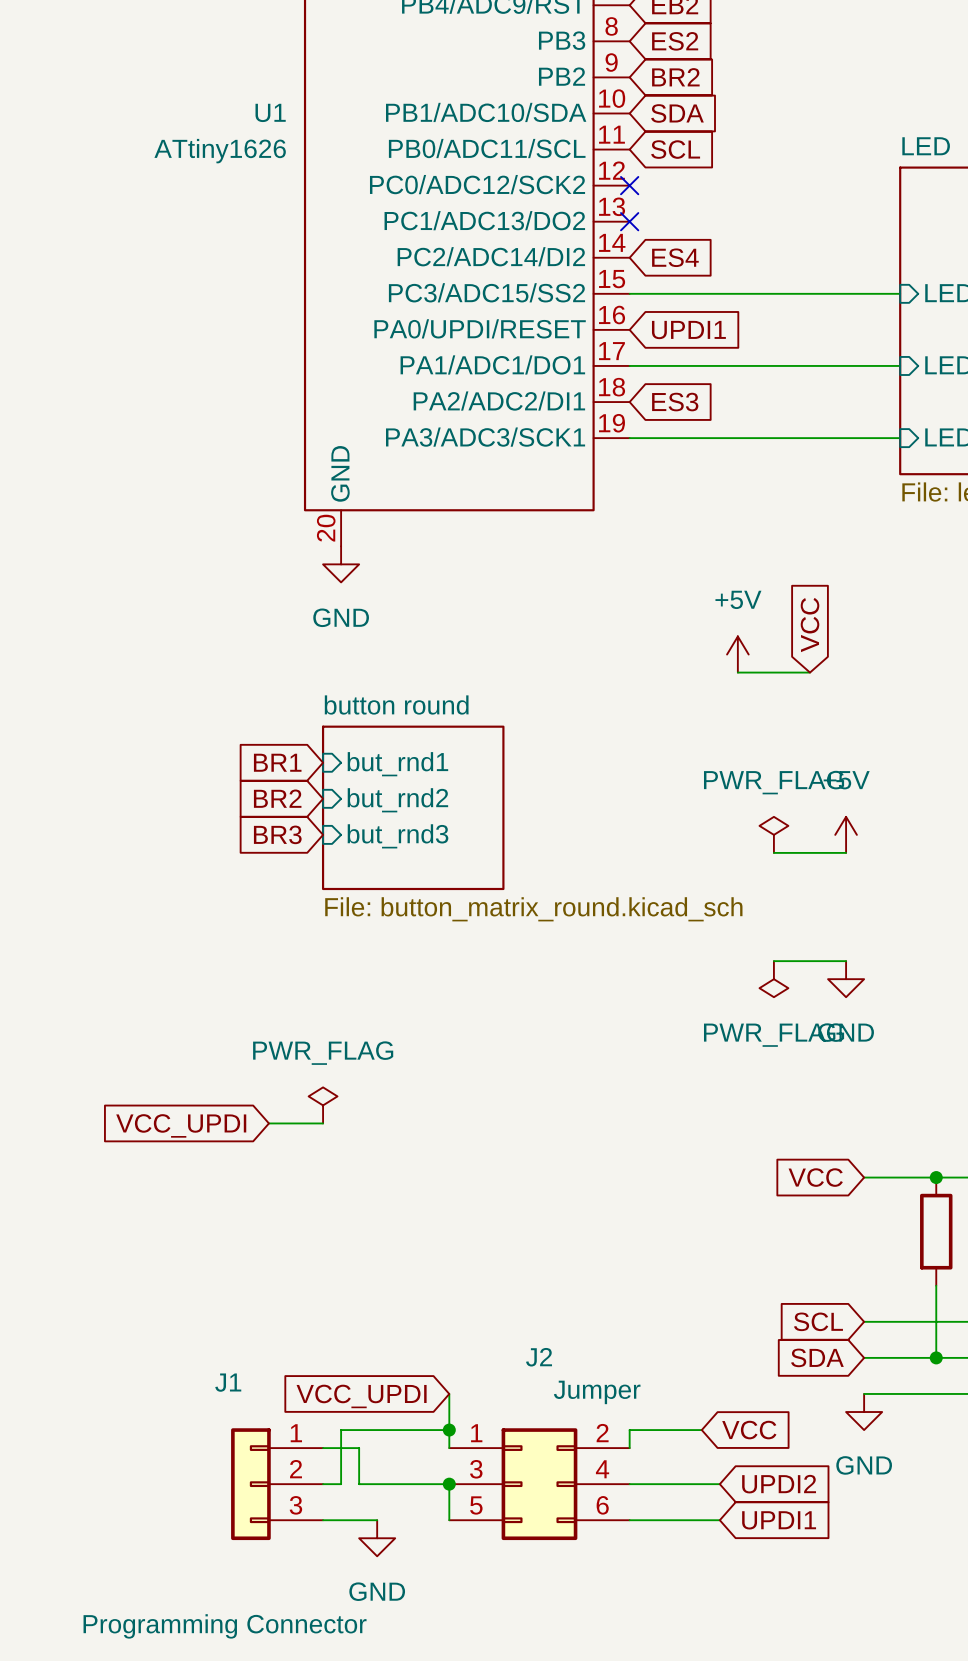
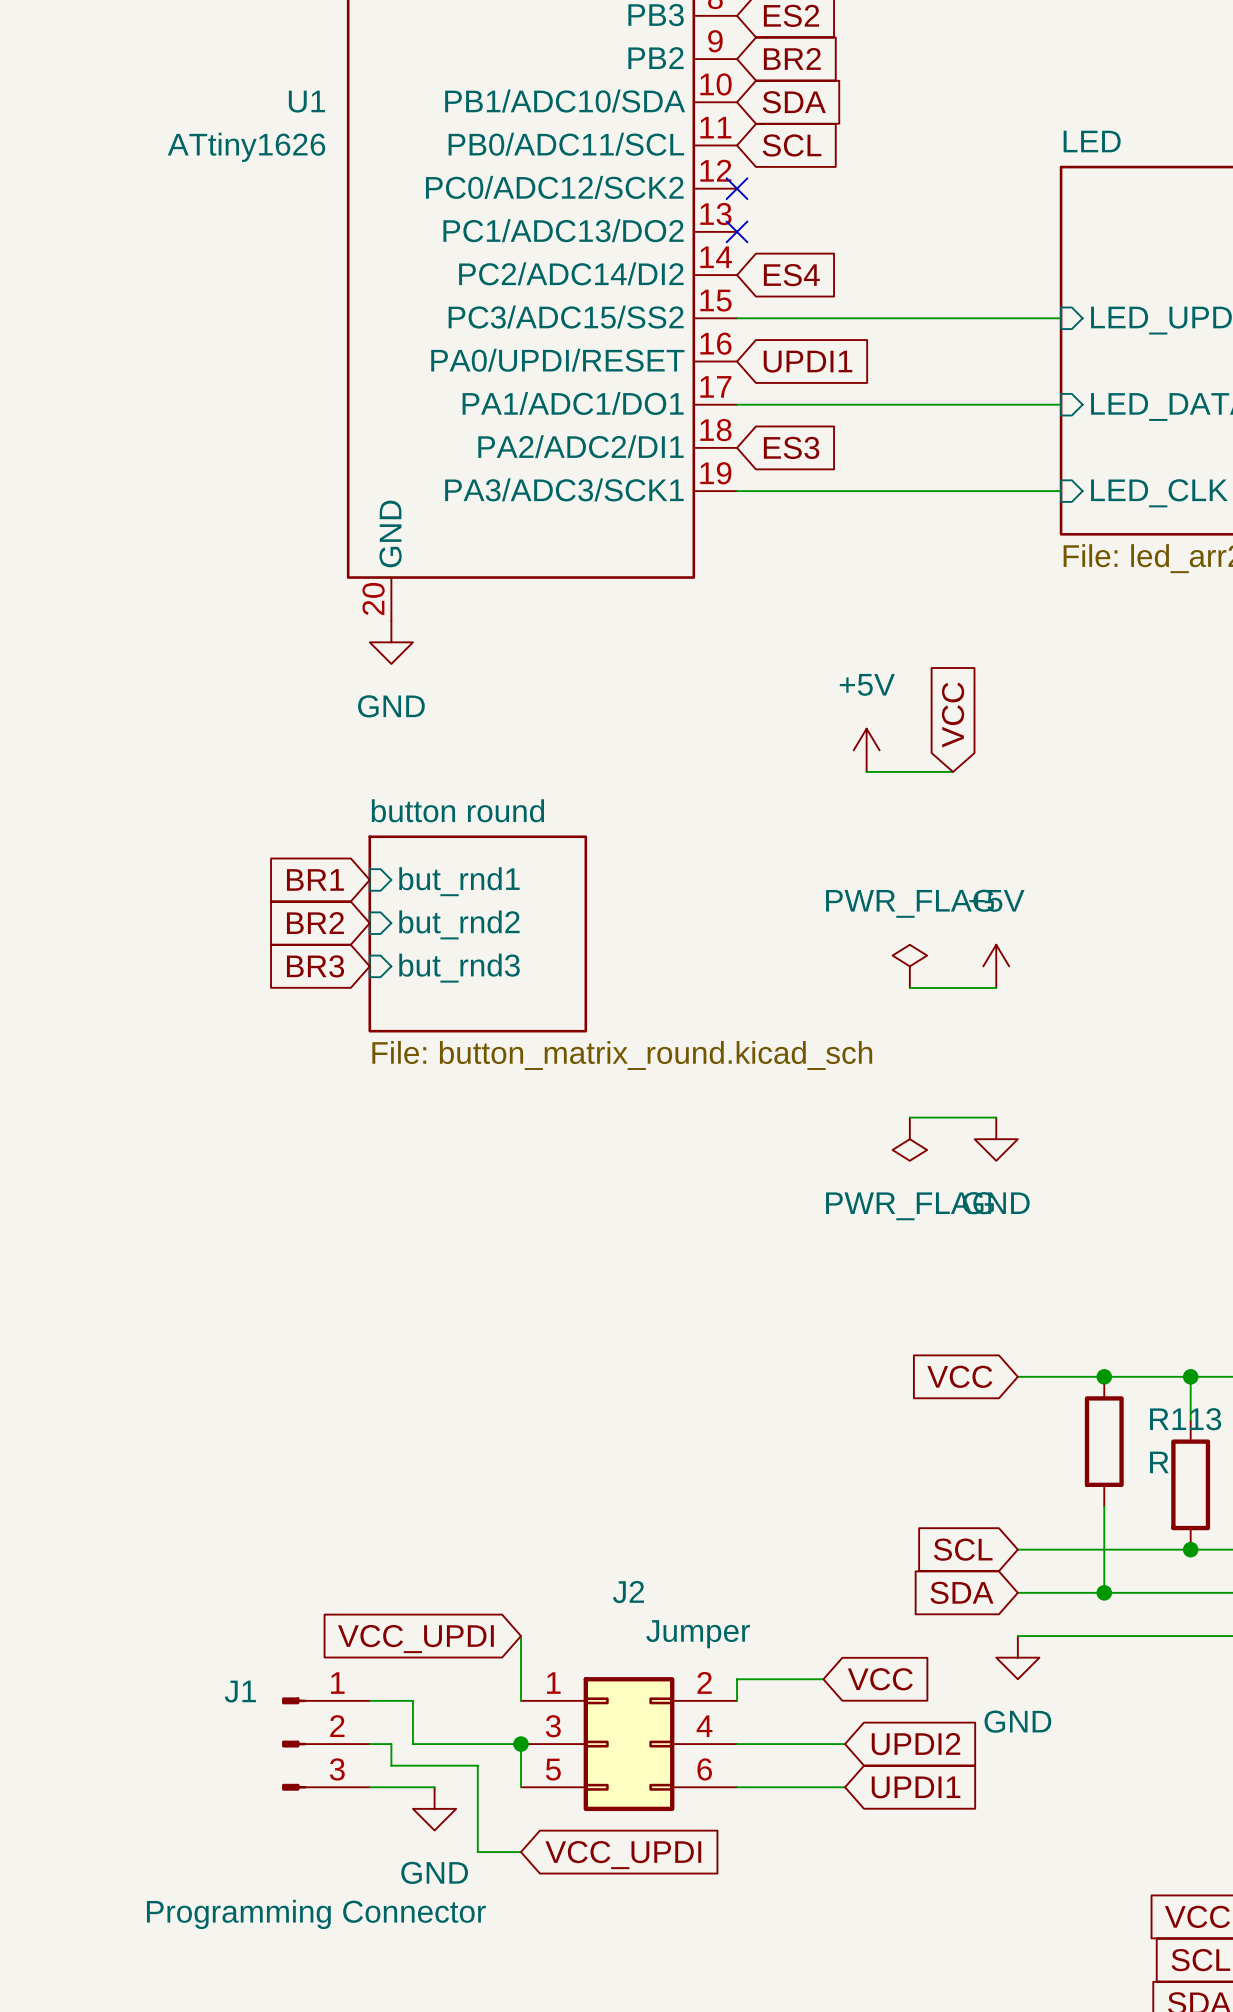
power symbol: PWR_FLAG (323, 1105) -> none
wire: (268, 1123) (323, 1123) -> none
global label: VCC_UPDI (181, 1125) -> none
J1 name position: J1 (228, 1382) -> J1 (240, 1691)
J1 symbol: [231, 1428, 324, 1541] -> [282, 1697, 370, 1791]
wire: (449, 1430) (341, 1430) (341, 1484) -> (521, 1852) (477, 1852) (477, 1765) (391, 1765) (391, 1744)
junction: (449, 1430) -> none
global label: none -> VCC_UPDI (623, 1855)
J1 value position: Programming Connector (225, 1626) -> Programming Connector (316, 1914)

